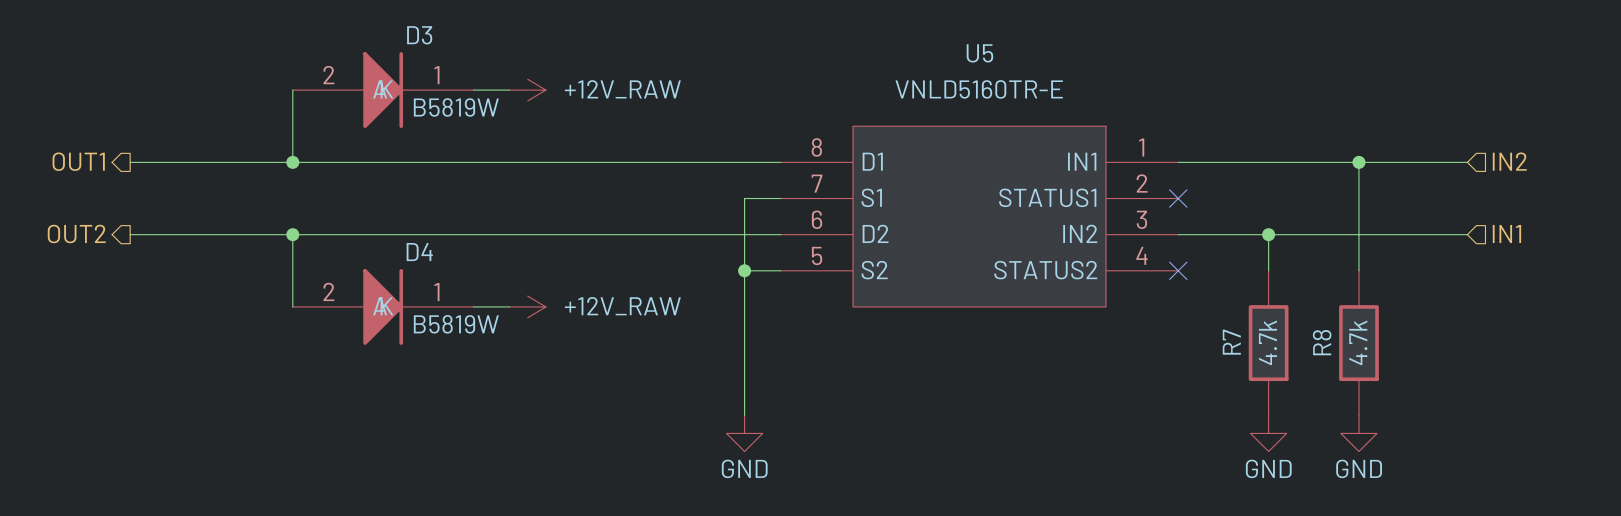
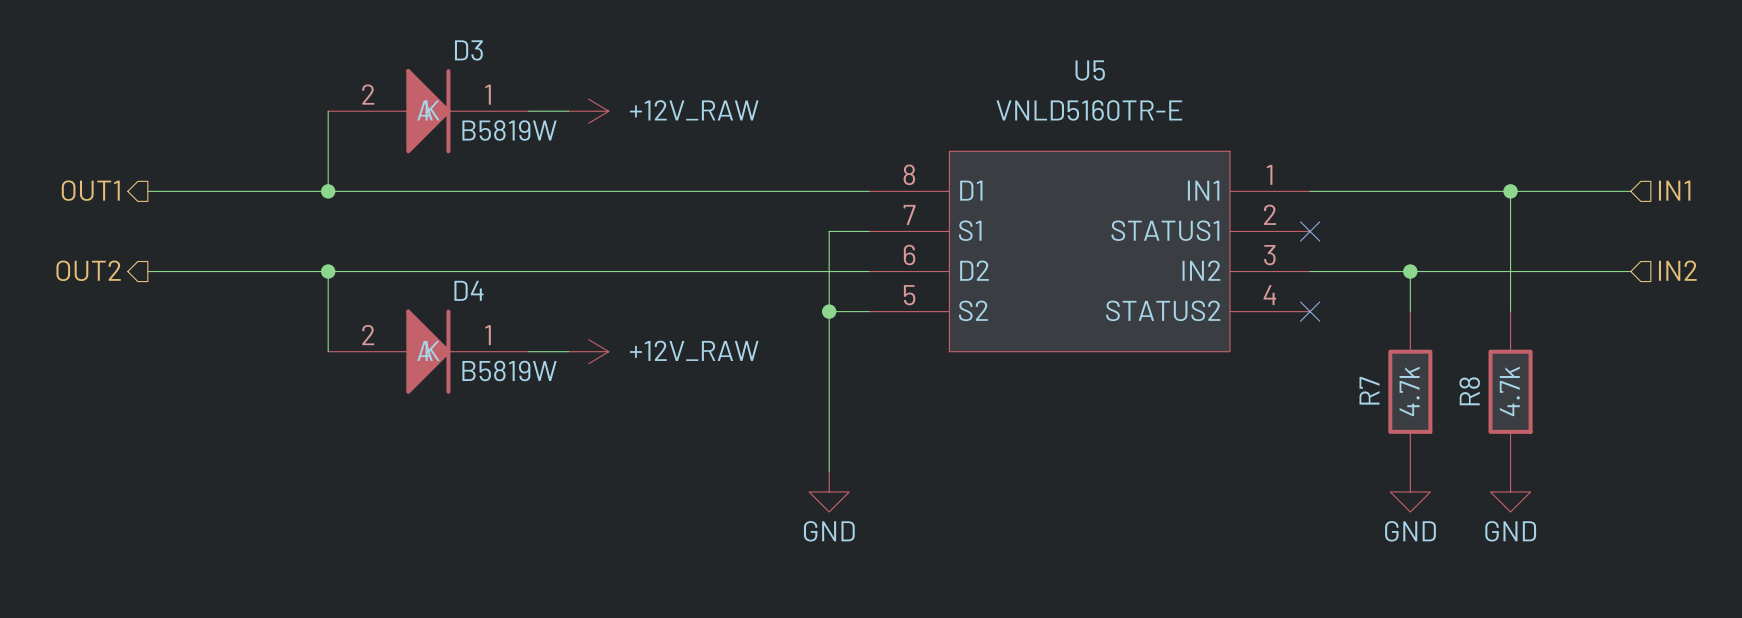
hierarchical label: IN2 (1509, 161) -> IN1 (1674, 190)
hierarchical label: IN1 (1506, 233) -> IN2 (1677, 270)

